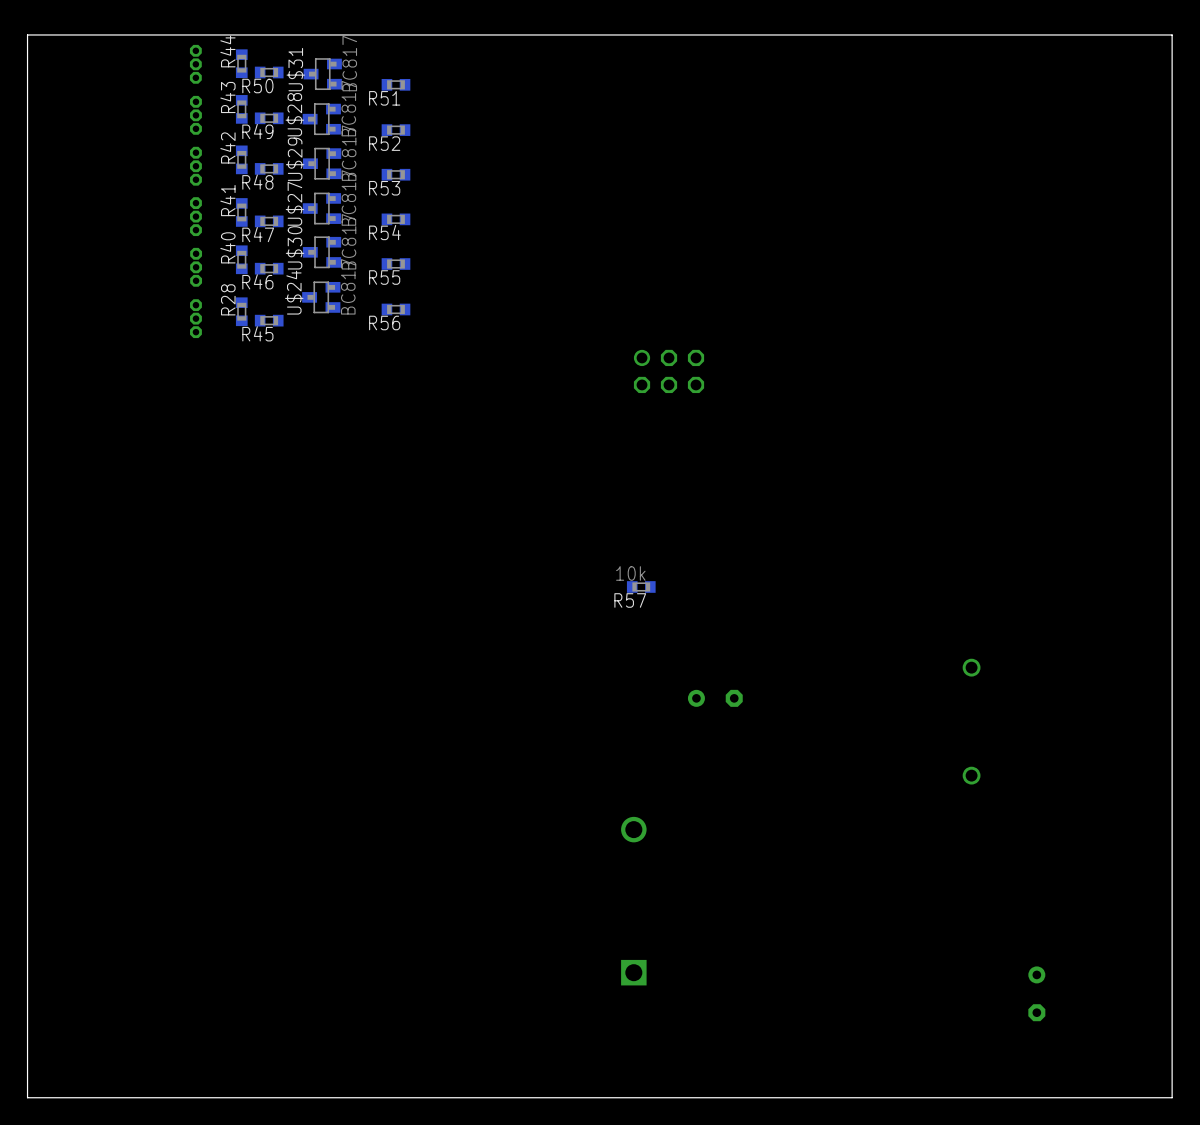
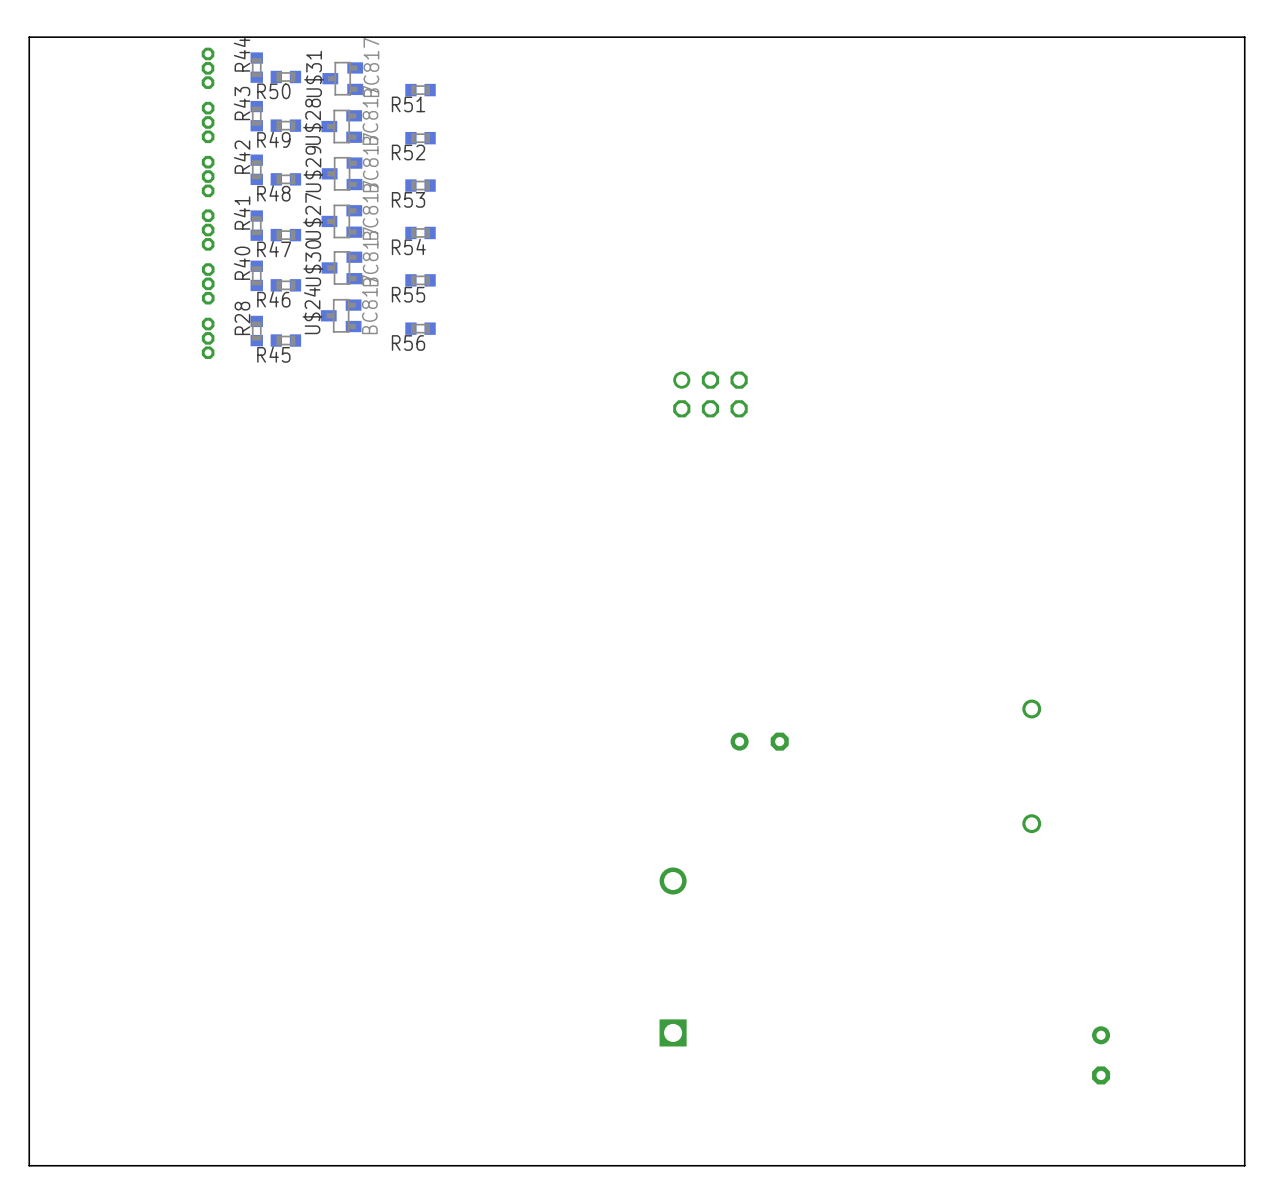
R57: 10k (641, 586) -> none

